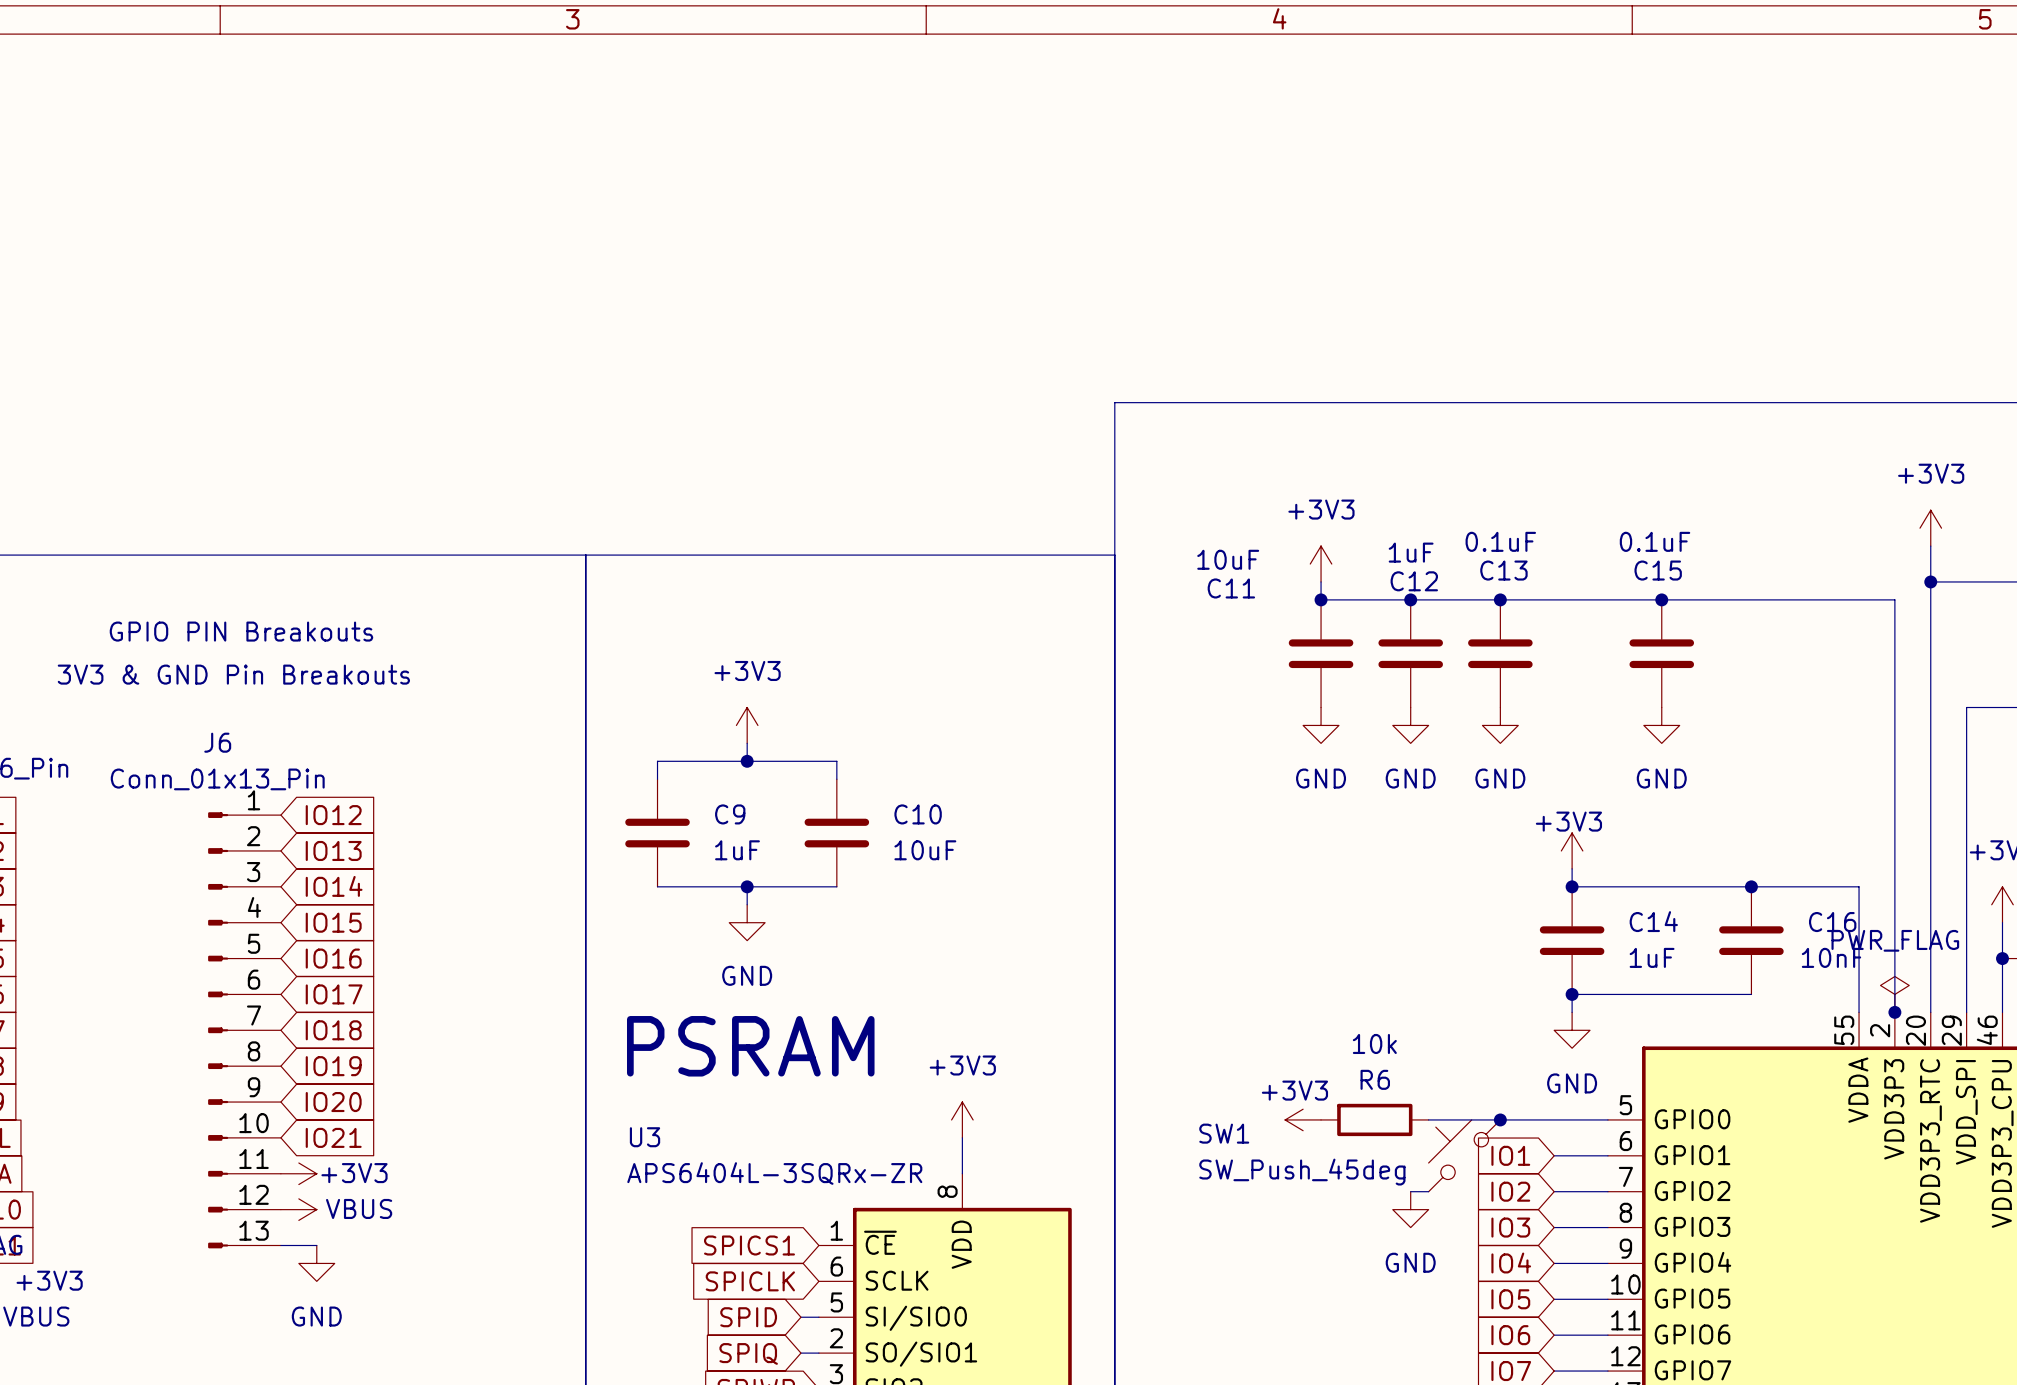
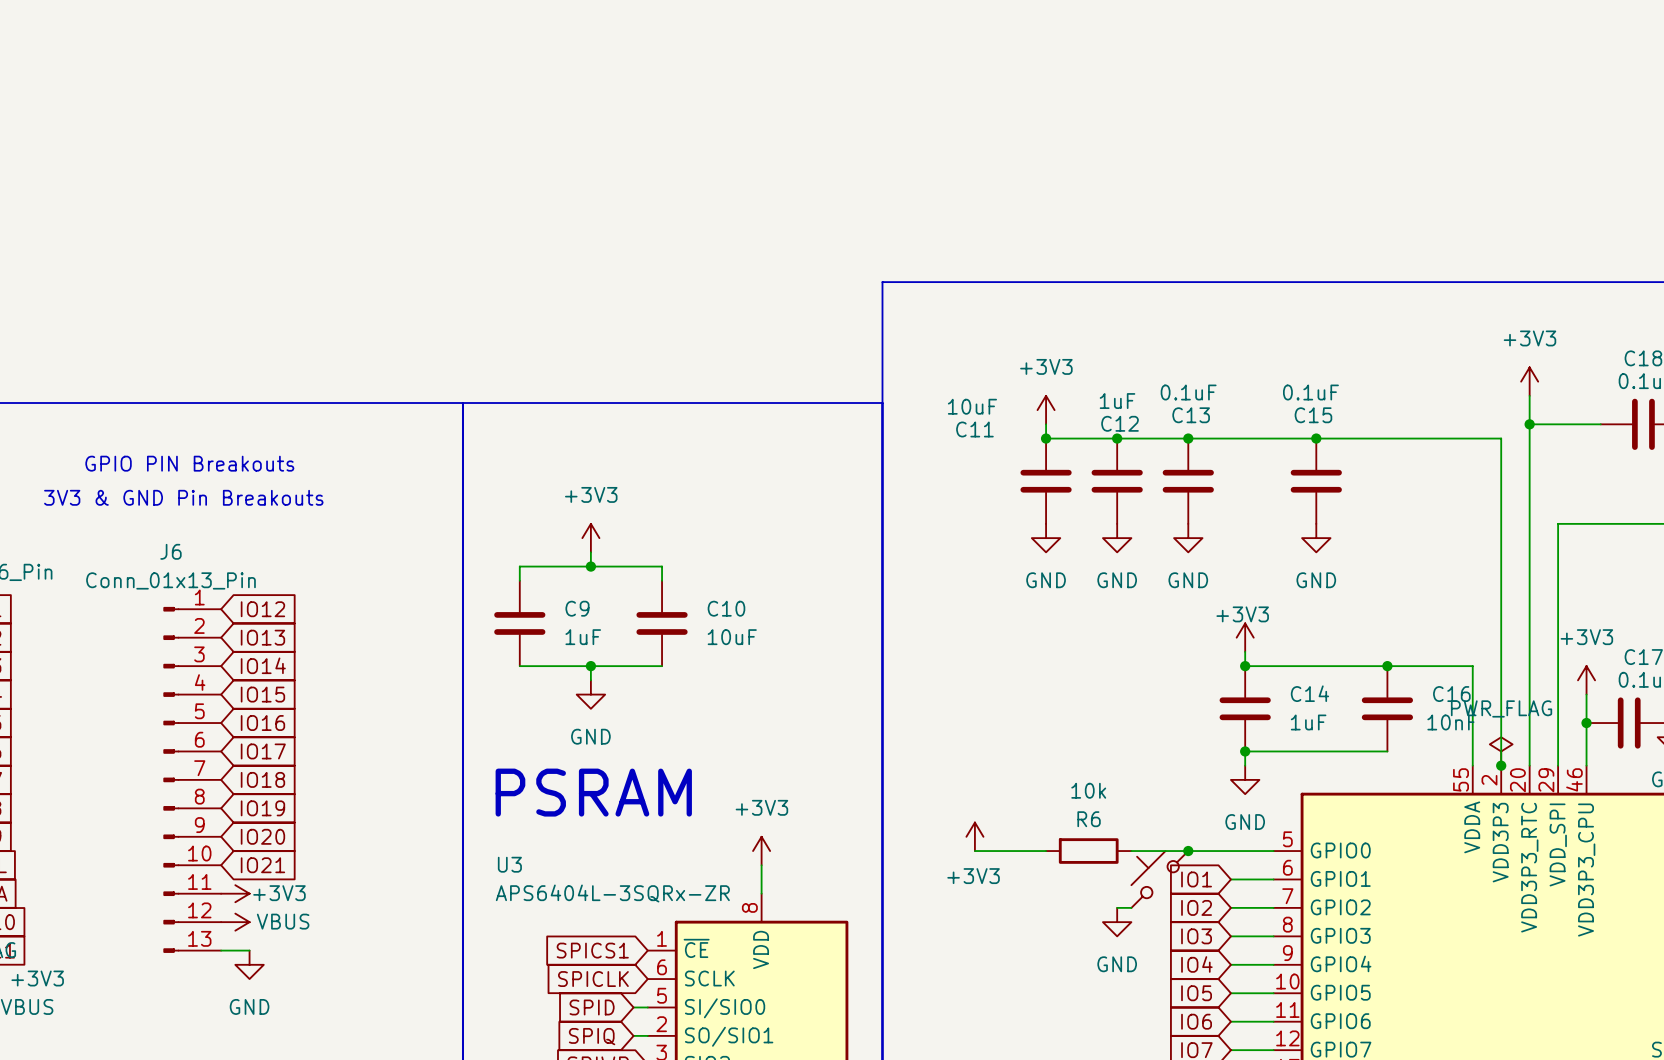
power symbol text position: +3V3 (1294, 1090) -> +3V3 (973, 876)
wire: none -> (974, 851) (1046, 851)
power symbol rotation: 0° (1303, 1119) -> 90° clockwise (974, 836)
power symbol position: +3V3 (1303, 1119) -> +3V3 (974, 836)
SW1 name: SW1 (1224, 1133) -> none
SW1 value: SW_Push_45deg (1302, 1172) -> none

